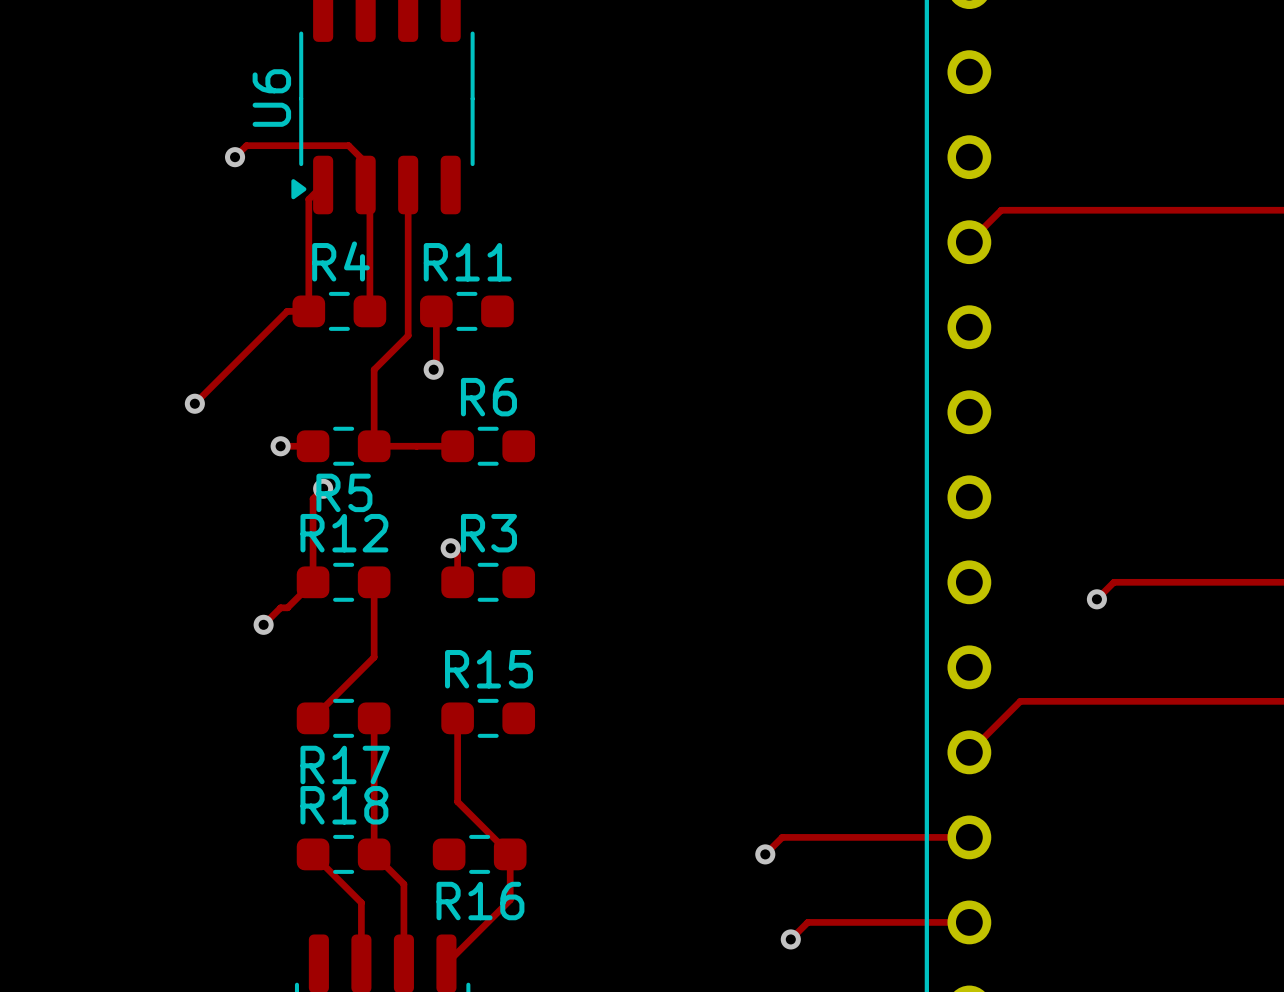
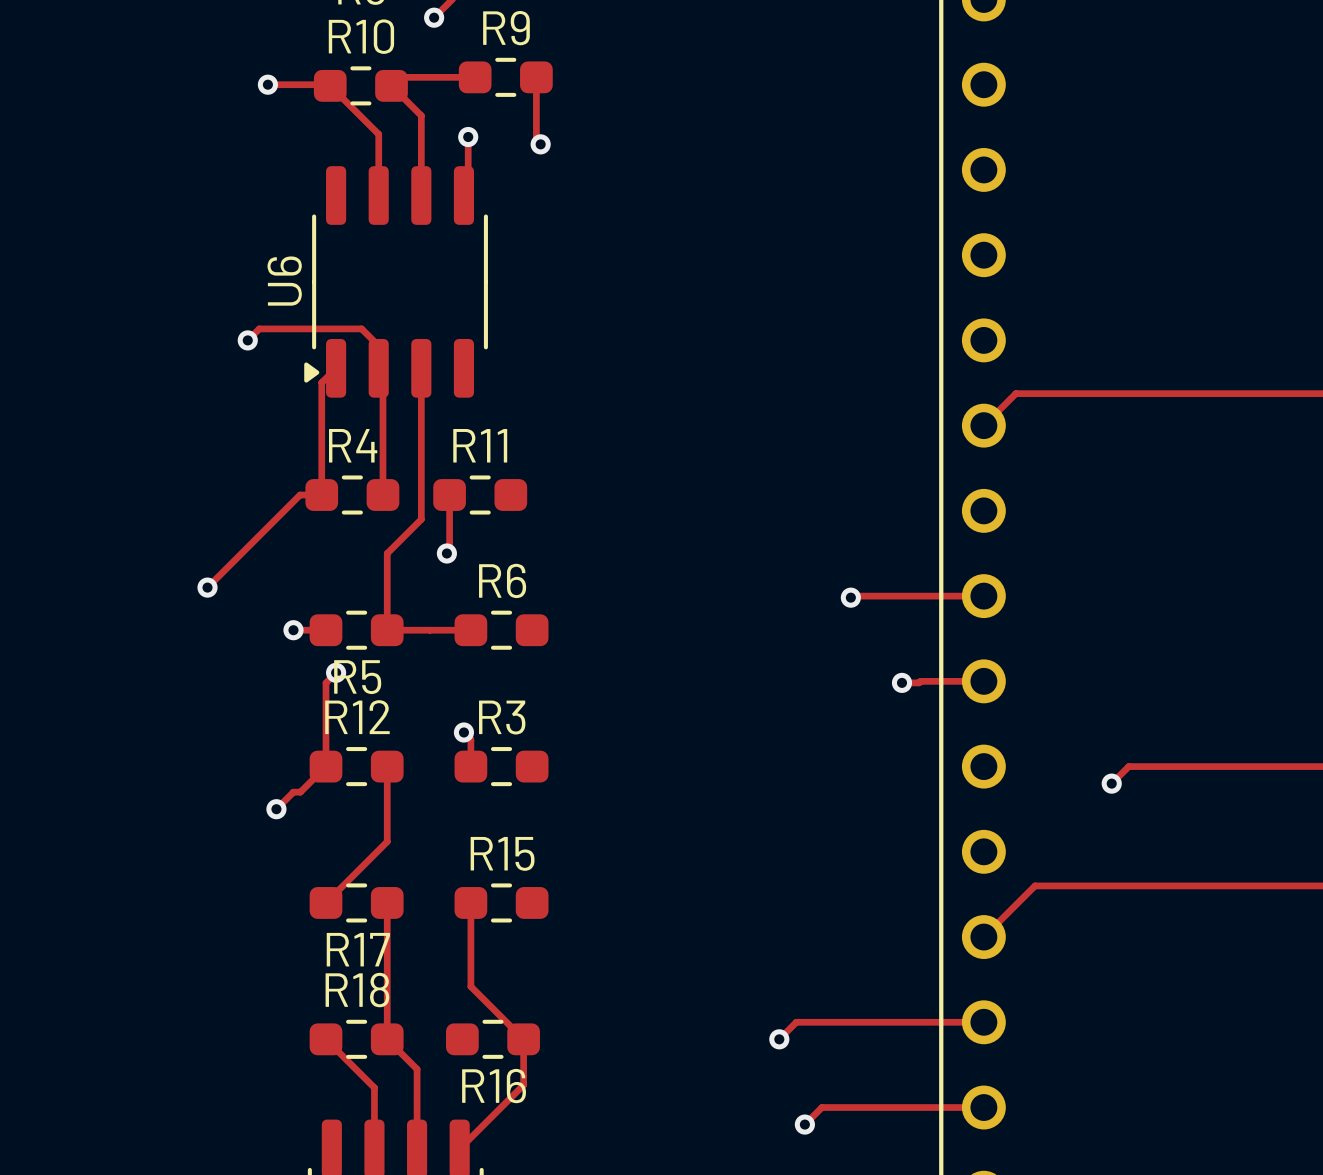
track: none -> (983, 596) (852, 596) (850, 597)
via: none -> (850, 597)
track: none -> (983, 681) (902, 682)
via: none -> (902, 682)

